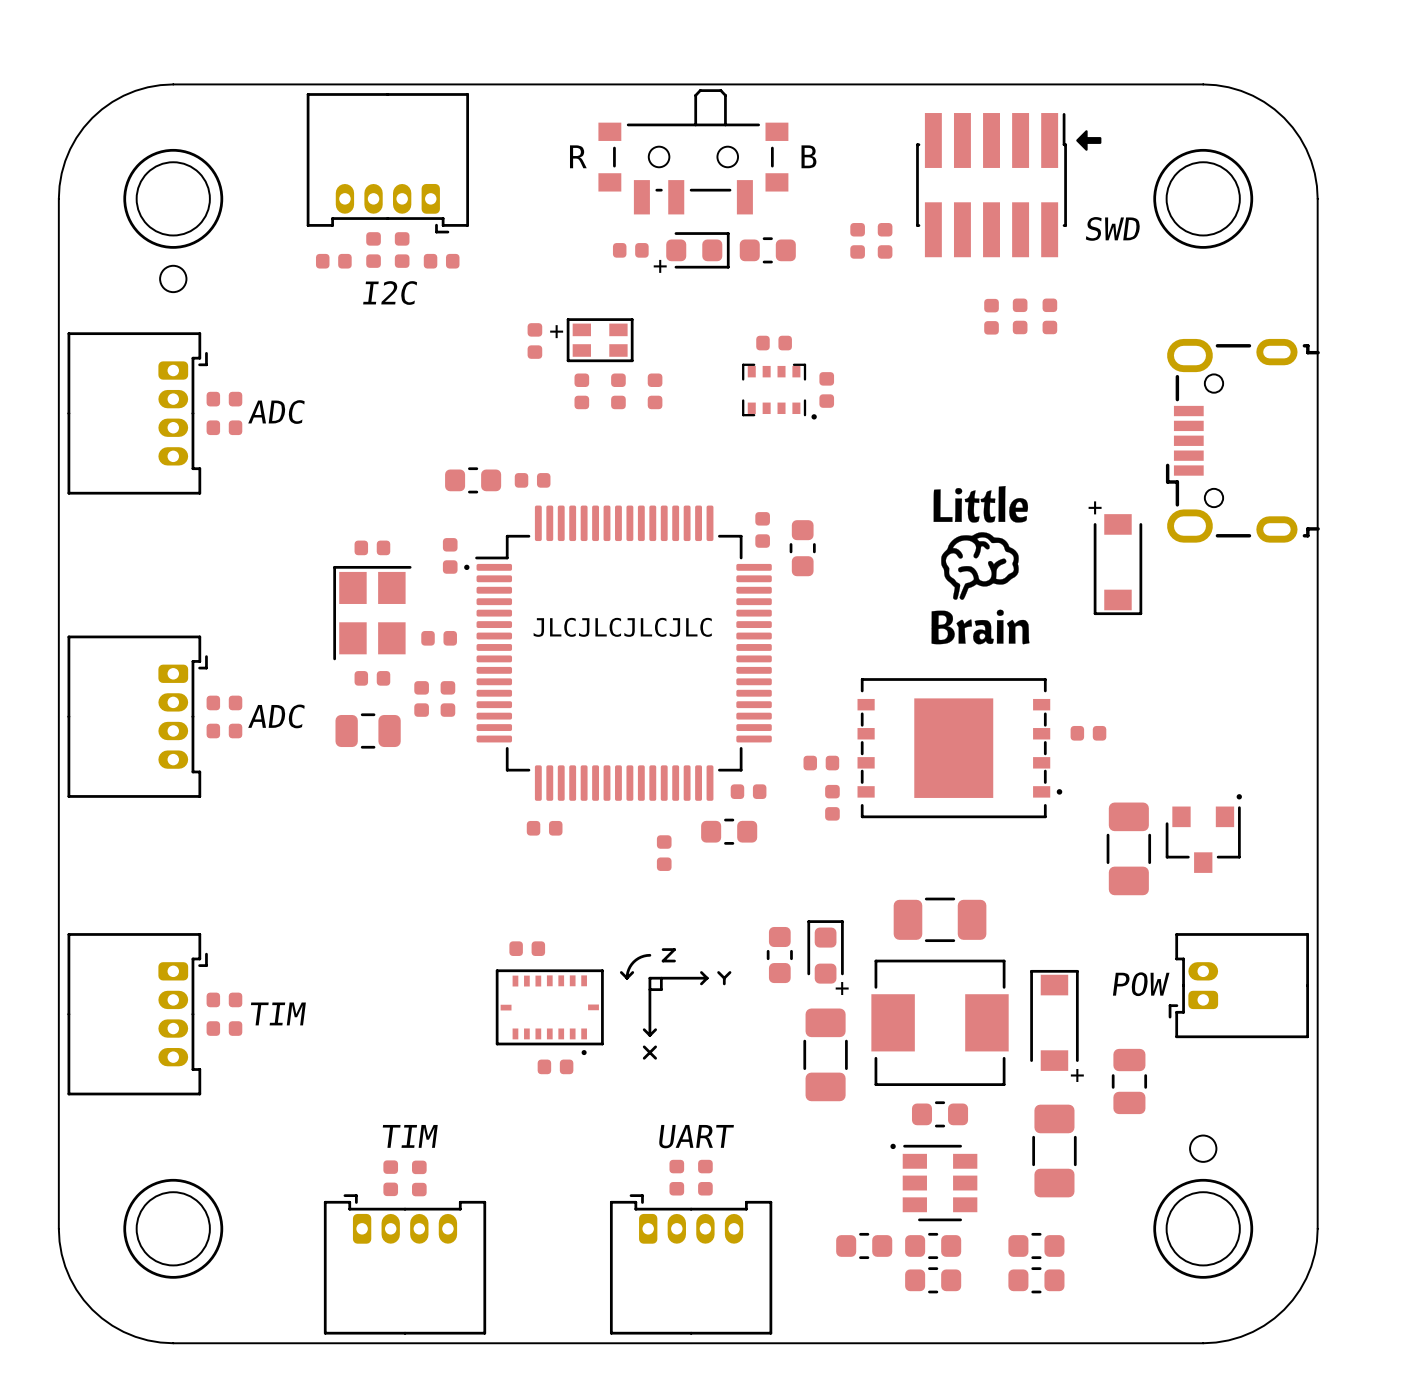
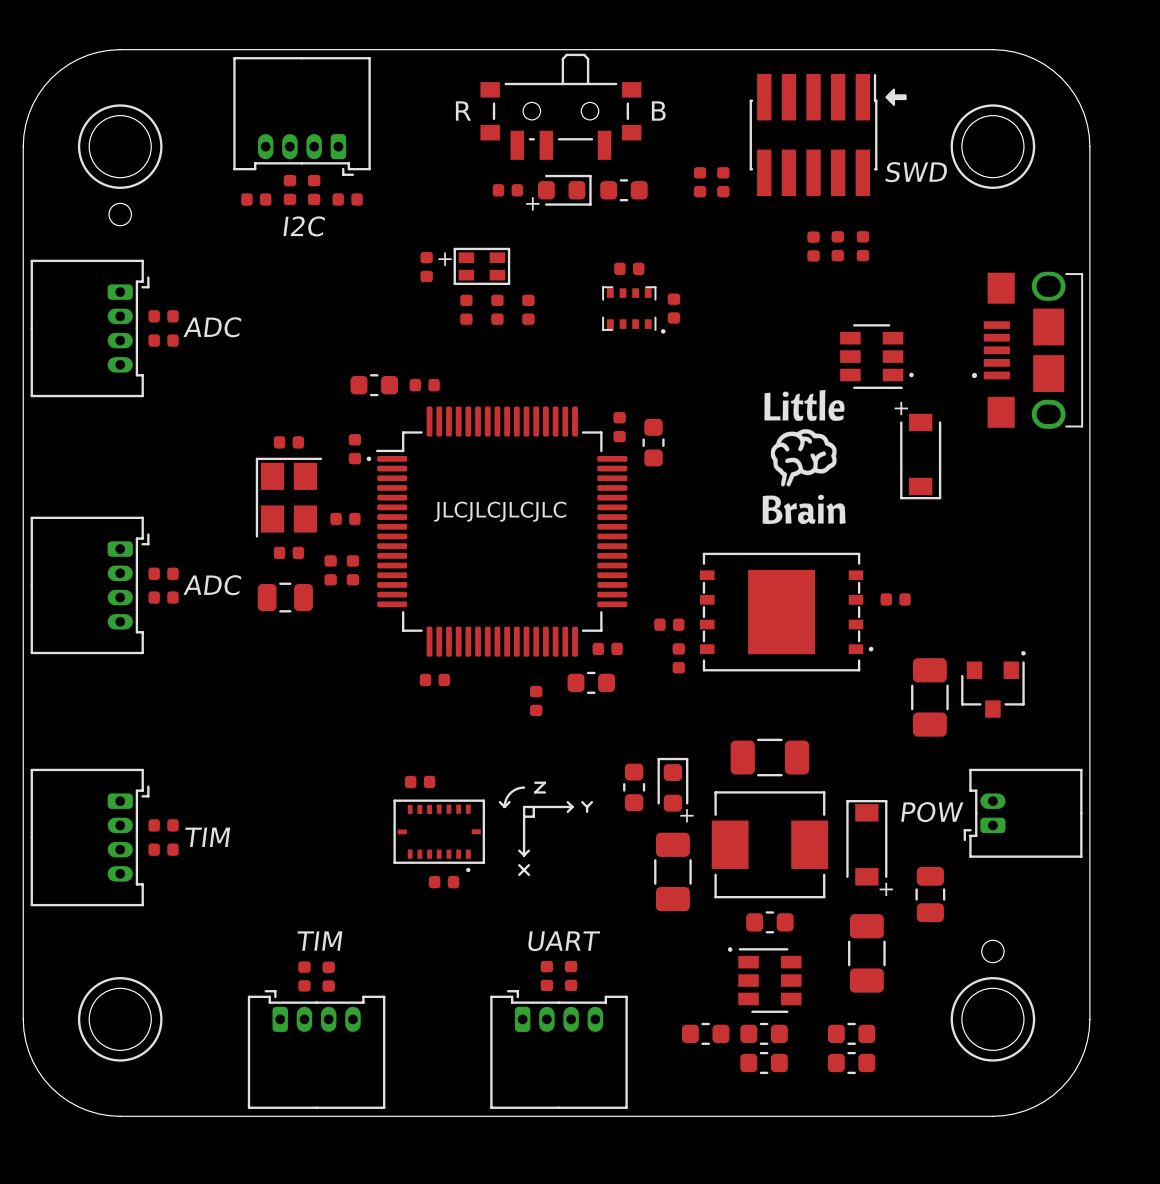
part footprint: [1165, 338, 1320, 543] -> [971, 271, 1084, 429]
part: none -> (871, 356)
drawing: none -> [909, 372, 914, 378]

